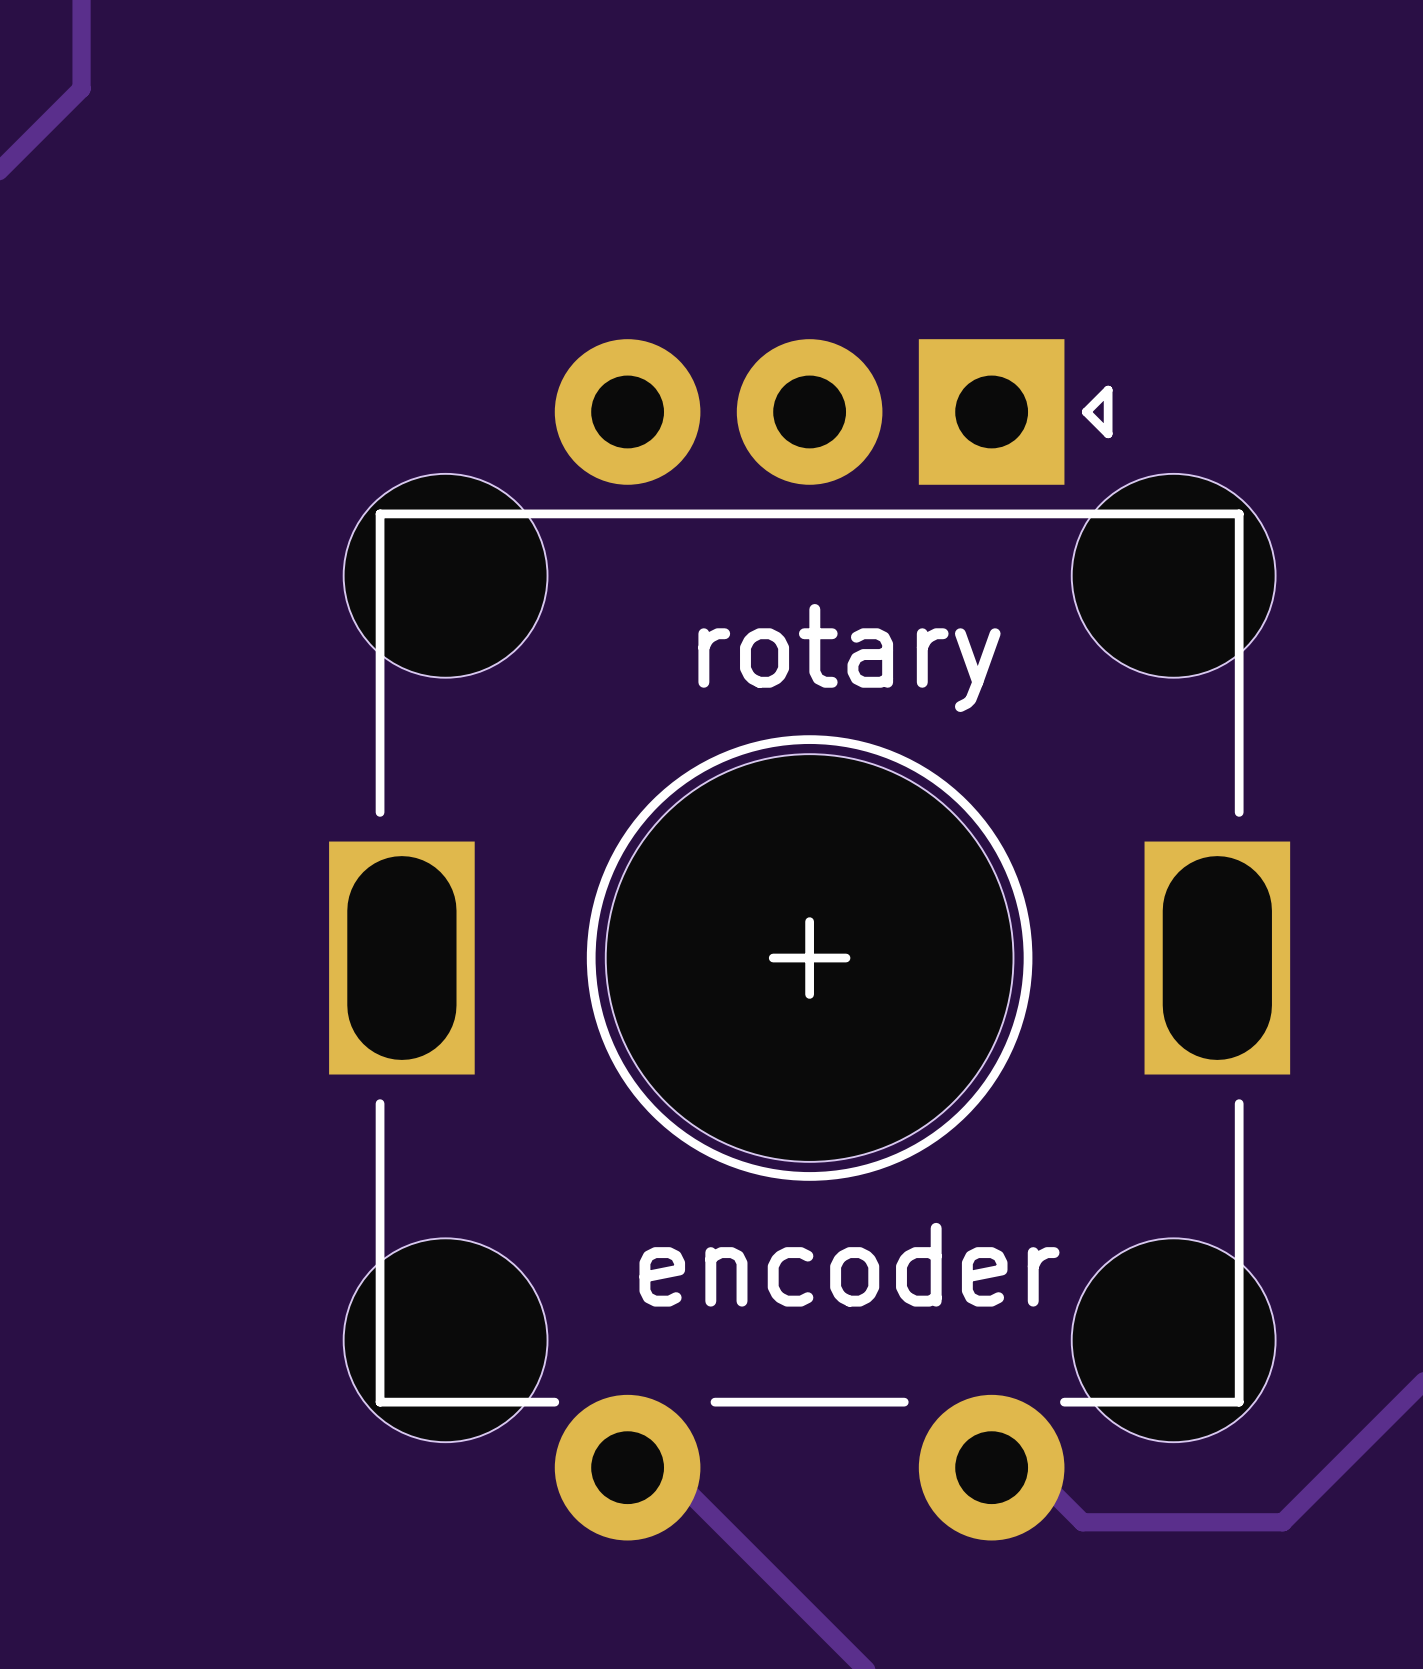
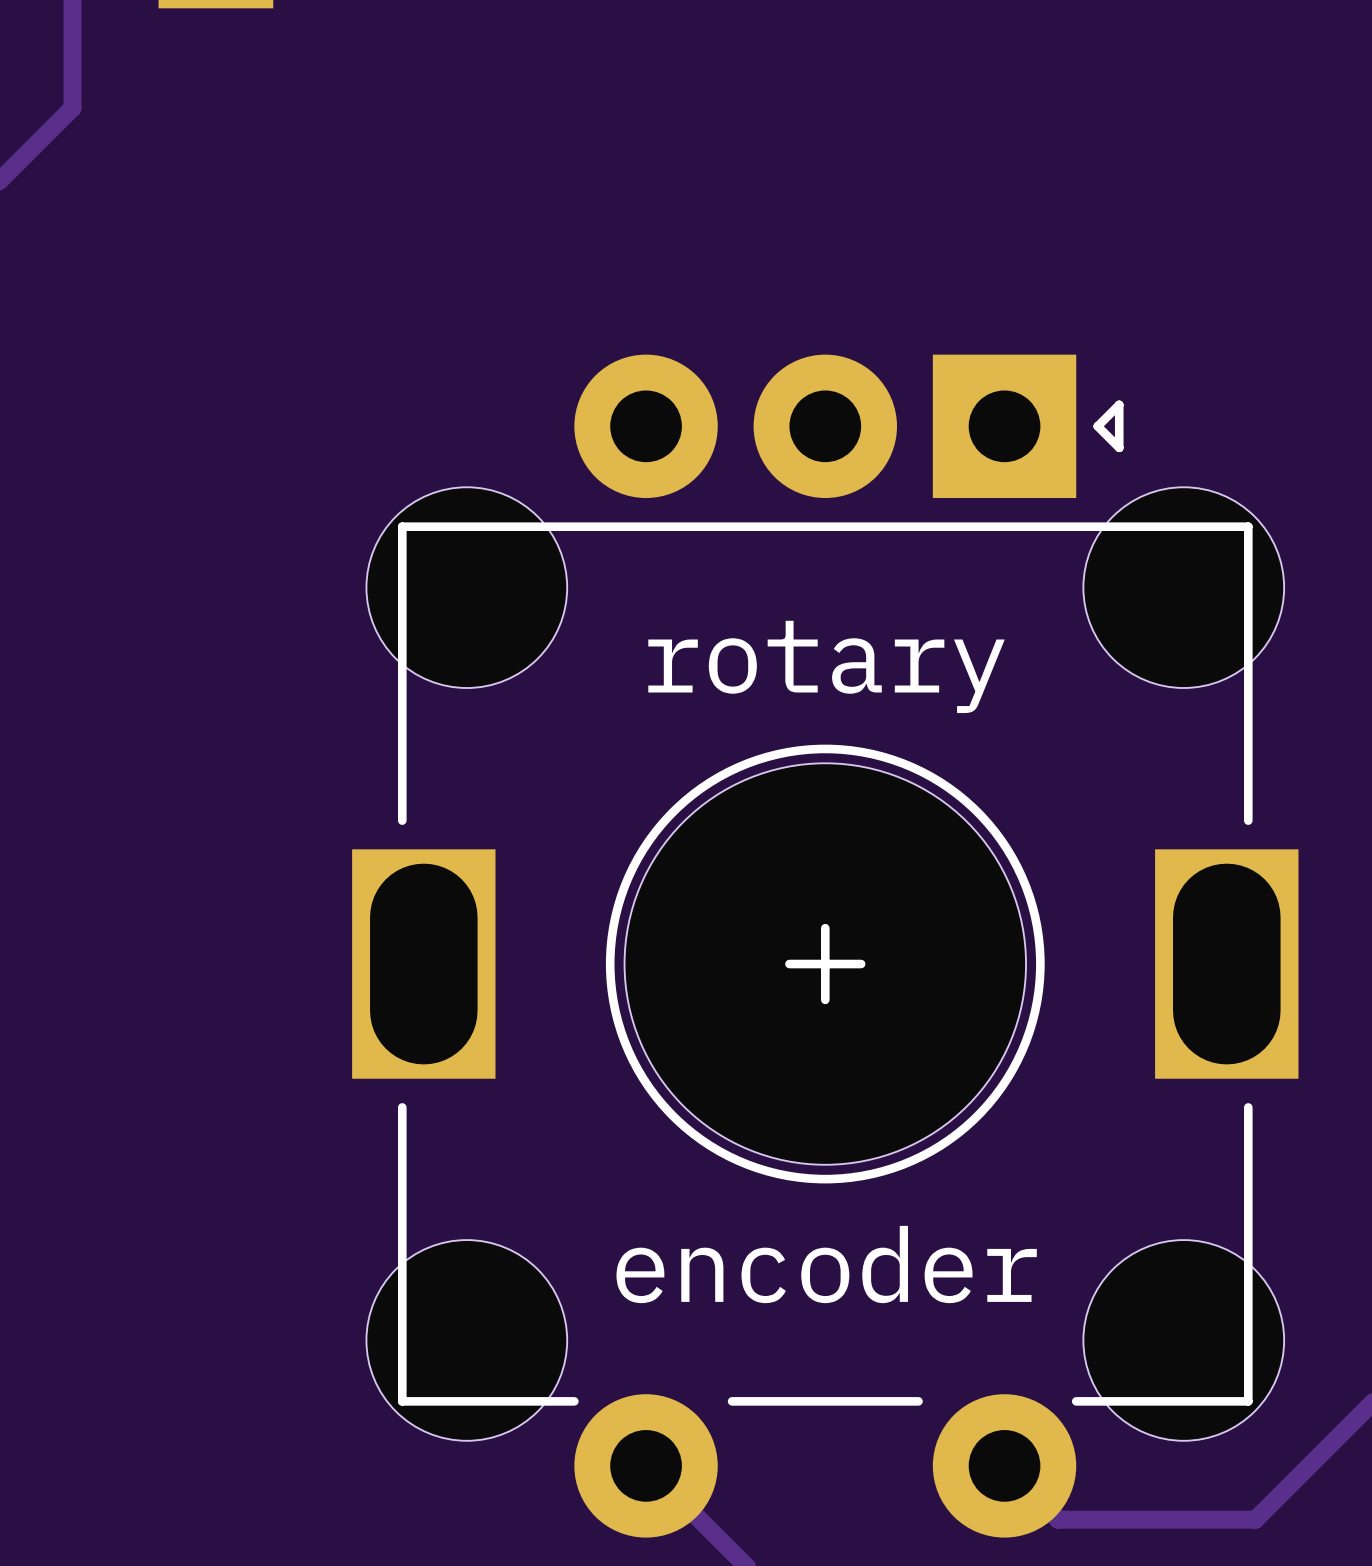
part position: (809, 939) -> (825, 946)

